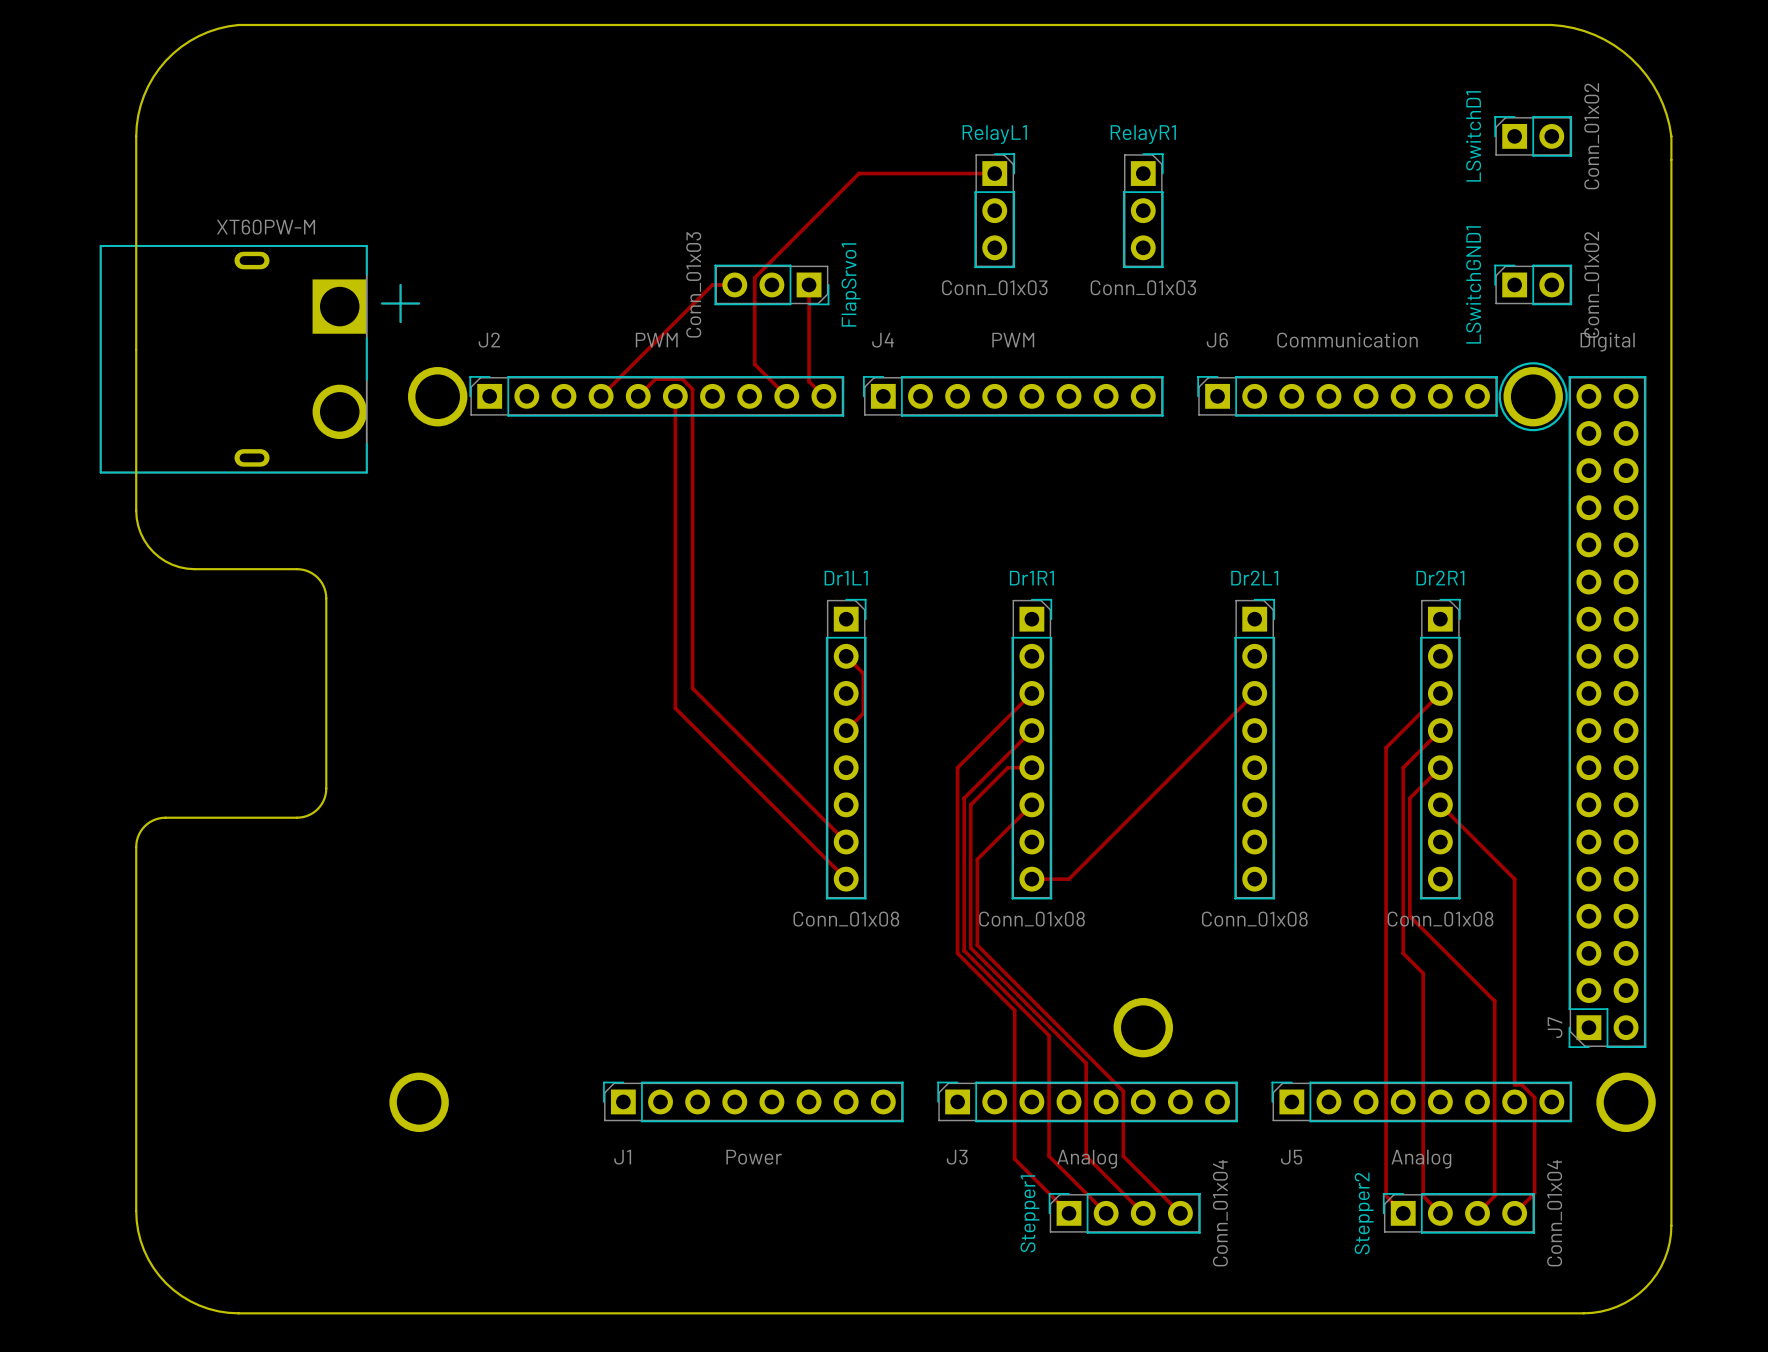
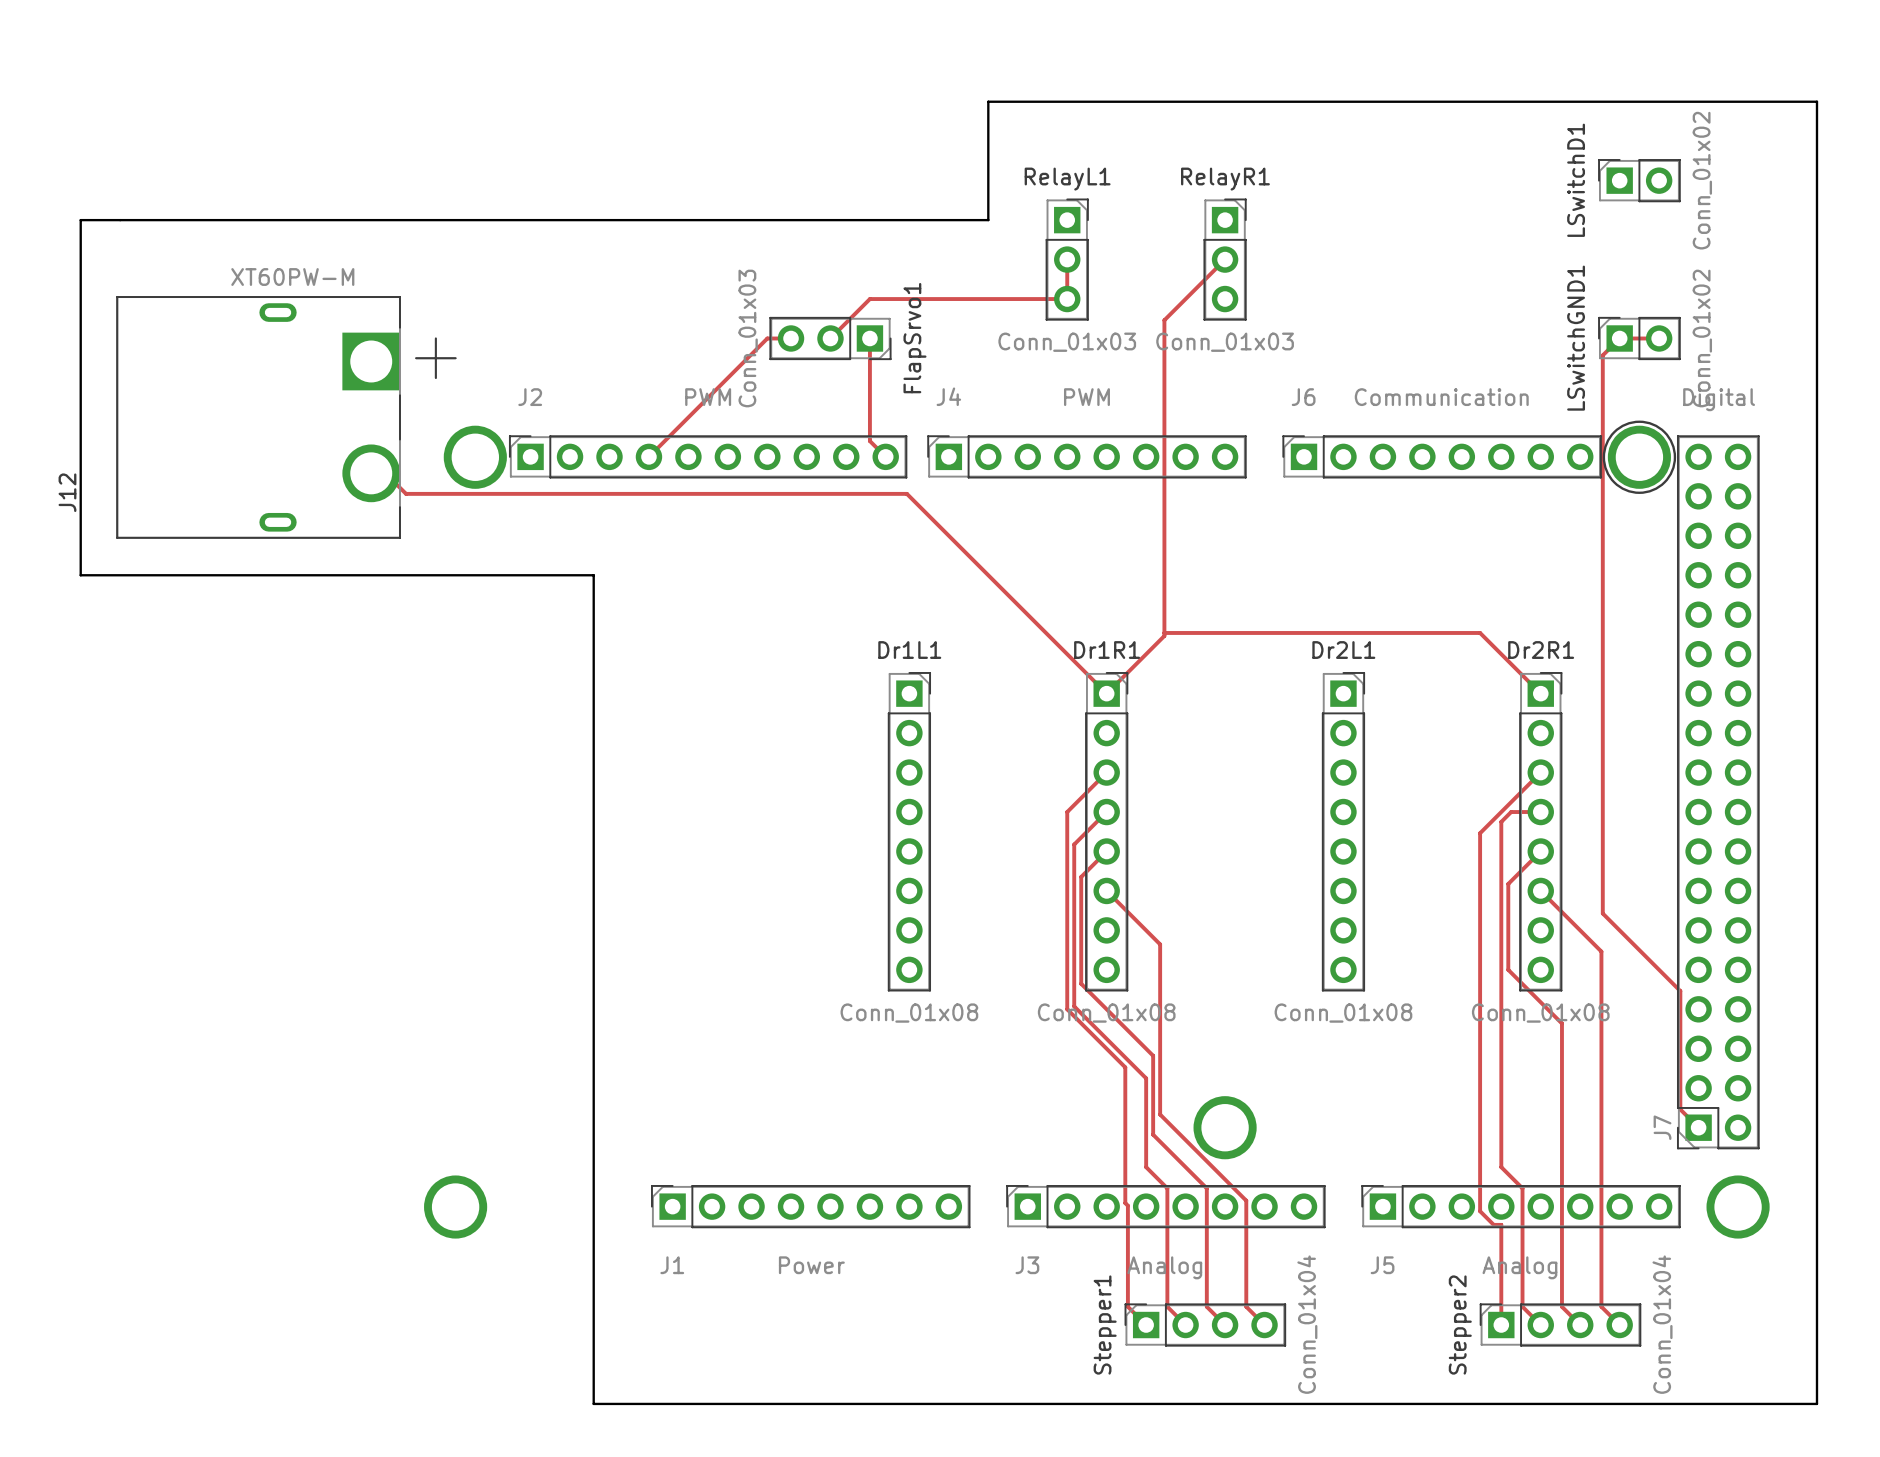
board edge: (238, 24) (1551, 24) (1573, 28) (1594, 34) (1614, 45) (1631, 59) (1646, 75) (1658, 94) (1666, 114) (1671, 136) (1671, 1225) (1667, 1251) (1661, 1266) (1651, 1281) (1639, 1293) (1617, 1306) (1600, 1311) (1583, 1313) (238, 1313) (208, 1308) (190, 1301) (173, 1290) (159, 1275) (148, 1259) (140, 1240) (136, 1221) (136, 846) (137, 837) (147, 824) (162, 817) (303, 816) (312, 813) (319, 806) (324, 798) (326, 788) (326, 598) (321, 582) (312, 573) (300, 569) (194, 569) (172, 564) (159, 557) (148, 546) (140, 533) (136, 518) (136, 136) (138, 115) (148, 86) (159, 68) (173, 53) (198, 36) (218, 28) (238, 24) -> (988, 101) (988, 220) (80, 220) (80, 575) (593, 575) (593, 1403) (1816, 1403) (1816, 101) (988, 101)
track: (994, 173) (859, 173) (754, 277) (754, 364) (786, 396) -> none
track: none -> (1067, 259) (1067, 299) (869, 299) (830, 338)
track: none -> (1225, 259) (1164, 320) (1164, 635) (1106, 693) (906, 493) (406, 493) (371, 459)
track: none -> (1659, 338) (1619, 338) (1602, 355) (1602, 913) (1680, 991) (1680, 1109) (1698, 1127)
track: (638, 396) (655, 379) (682, 379) (692, 389) (692, 688) (846, 841) -> none
track: (675, 396) (675, 708) (846, 879) -> none
J12 name: none -> J12 (67, 492)
track: none -> (1164, 632) (1480, 632) (1540, 693)
track: (846, 656) (863, 673) (863, 713) (846, 730) -> none
track: (1254, 693) (1069, 879) (1031, 879) -> none
track: (994, 730) (957, 767) (957, 953) (1014, 1010) (1014, 1159) (1051, 1196) -> (1067, 812) (1067, 1009) (1125, 1067) (1127, 1306)
track: (1440, 730) (1403, 767) -> (1540, 812) (1511, 812) (1501, 821) (1501, 851)
track: (1386, 747) (1386, 1196) (1403, 1213) -> (1483, 830) (1480, 833) (1480, 1211) (1493, 1224) (1501, 1224) (1501, 1325)
track: (1001, 761) (964, 798) (964, 950) (1049, 1035) (1049, 1156) (1088, 1196) -> (1074, 844) (1074, 1006) (1146, 1078) (1146, 1167) (1167, 1188) (1167, 1306)
track: (1031, 767) (1007, 767) (970, 804) (970, 947) (1086, 1063) (1086, 1156) (1126, 1196) -> (1106, 851) (1081, 876) (1081, 983) (1153, 1055) (1153, 1134) (1206, 1188) (1206, 1306)
track: (1031, 804) (977, 859) (977, 945) (1123, 1091) (1123, 1156) (1163, 1196) -> (1106, 890) (1160, 944) (1160, 1114) (1246, 1200) (1246, 1306)
track: (1497, 861) (1514, 879) (1514, 1084) (1521, 1084) (1534, 1097) (1534, 1193) (1514, 1213) -> (1601, 951) (1601, 1306) (1619, 1325)
track: (1409, 879) (1409, 916) (1494, 1001) (1494, 1196) (1477, 1213) -> (1508, 969) (1561, 1023) (1561, 1306) (1580, 1325)
track: (1403, 953) (1423, 973) (1423, 1084) -> (1501, 1048) (1501, 1167) (1522, 1188)

